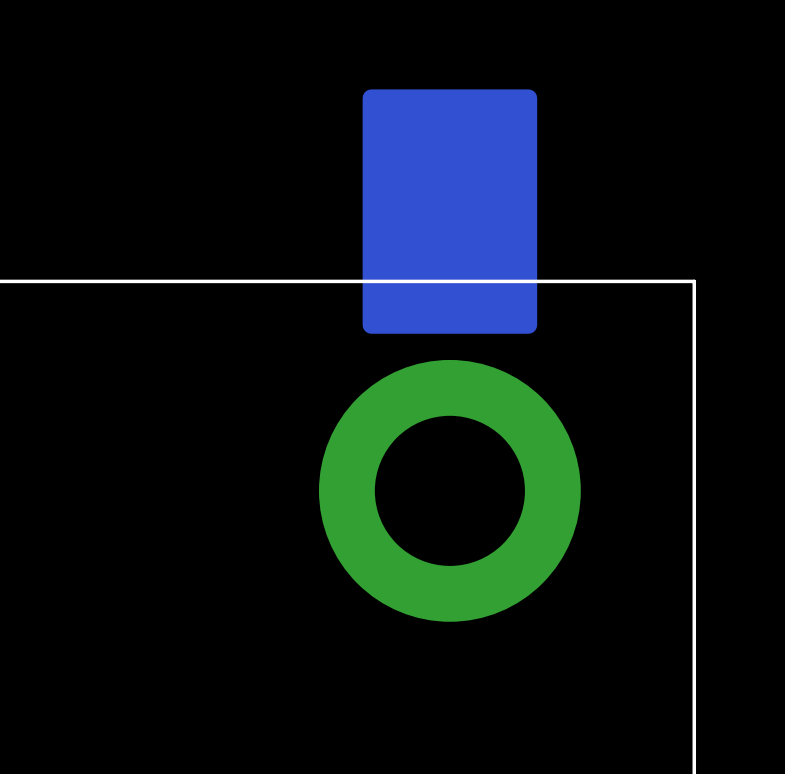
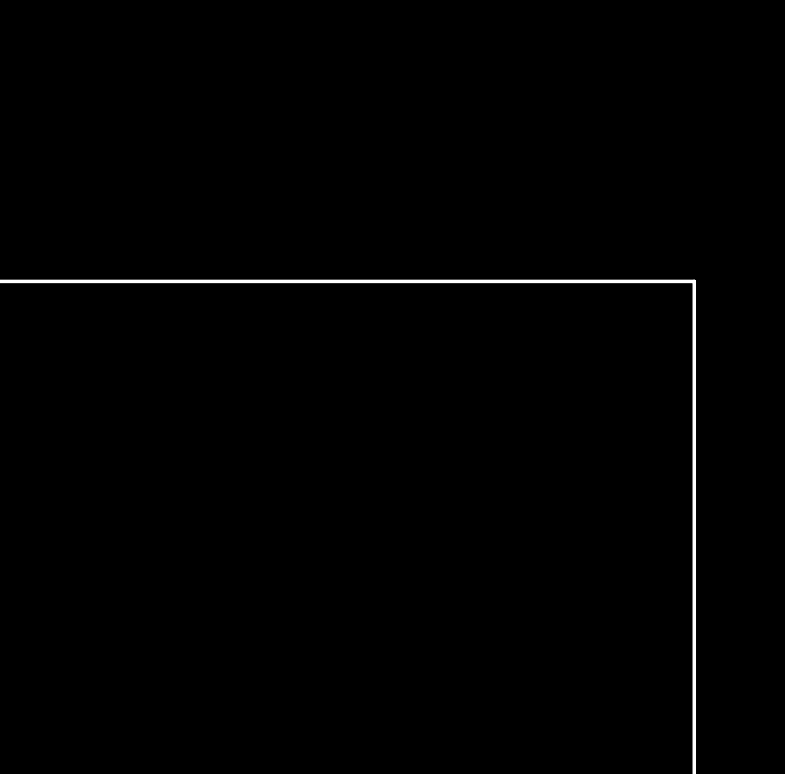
part: (449, 355) -> none

